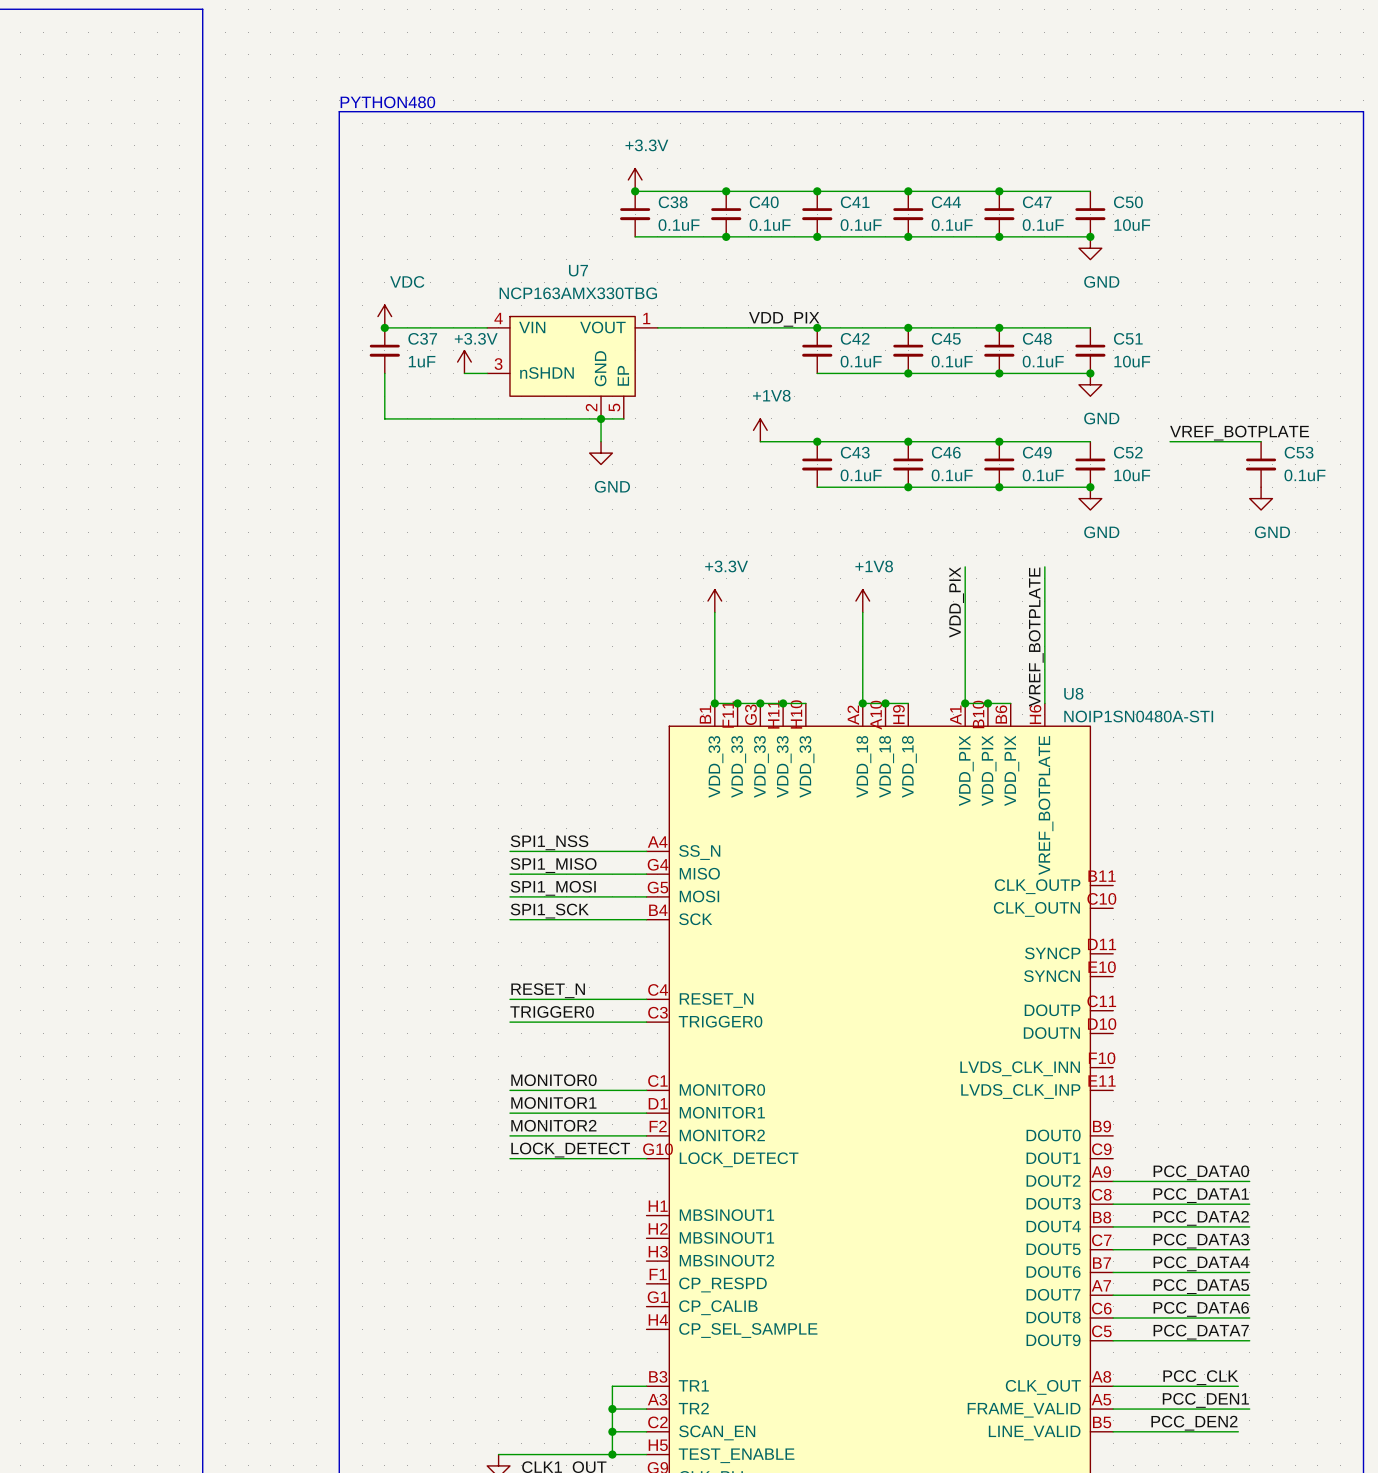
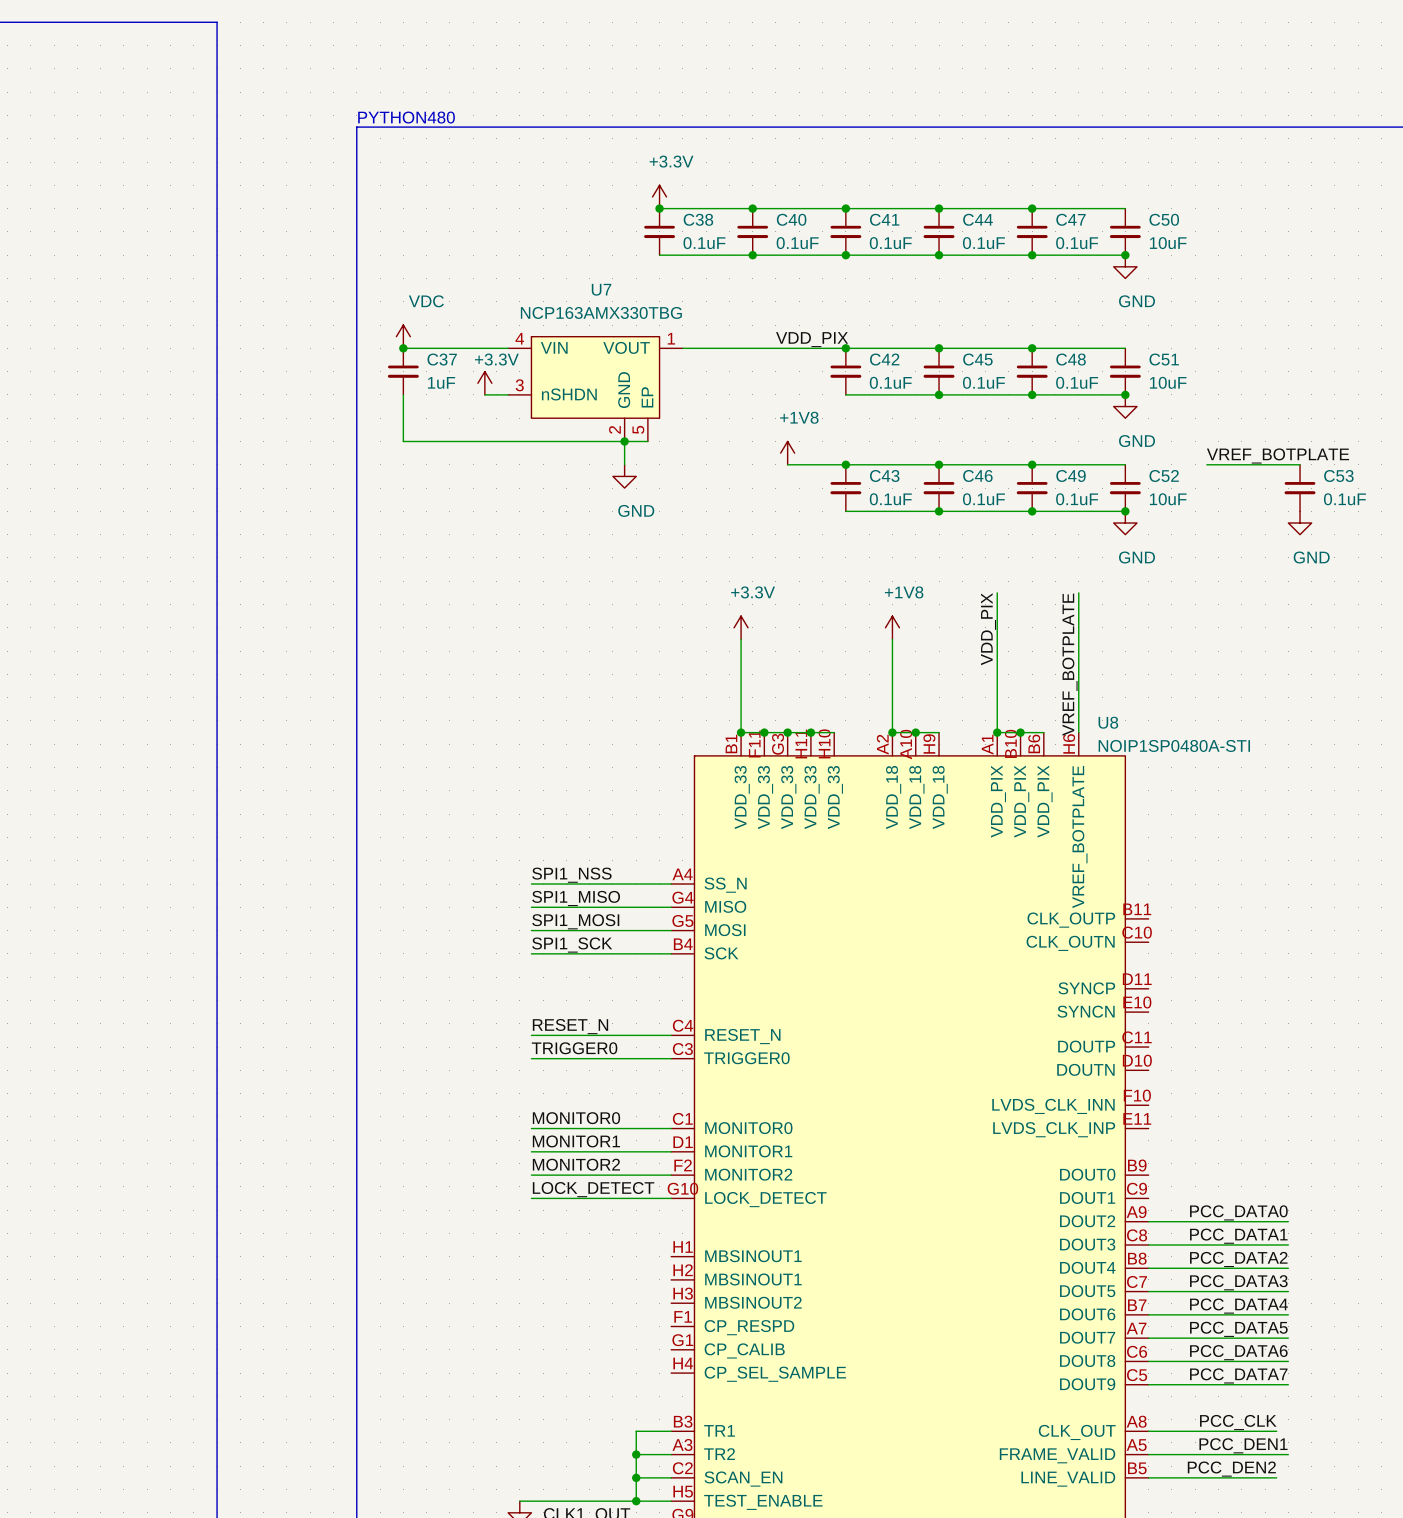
U8 value: NOIP1SN0480A-STI (1138, 716) -> NOIP1SP0480A-STI (1174, 745)

